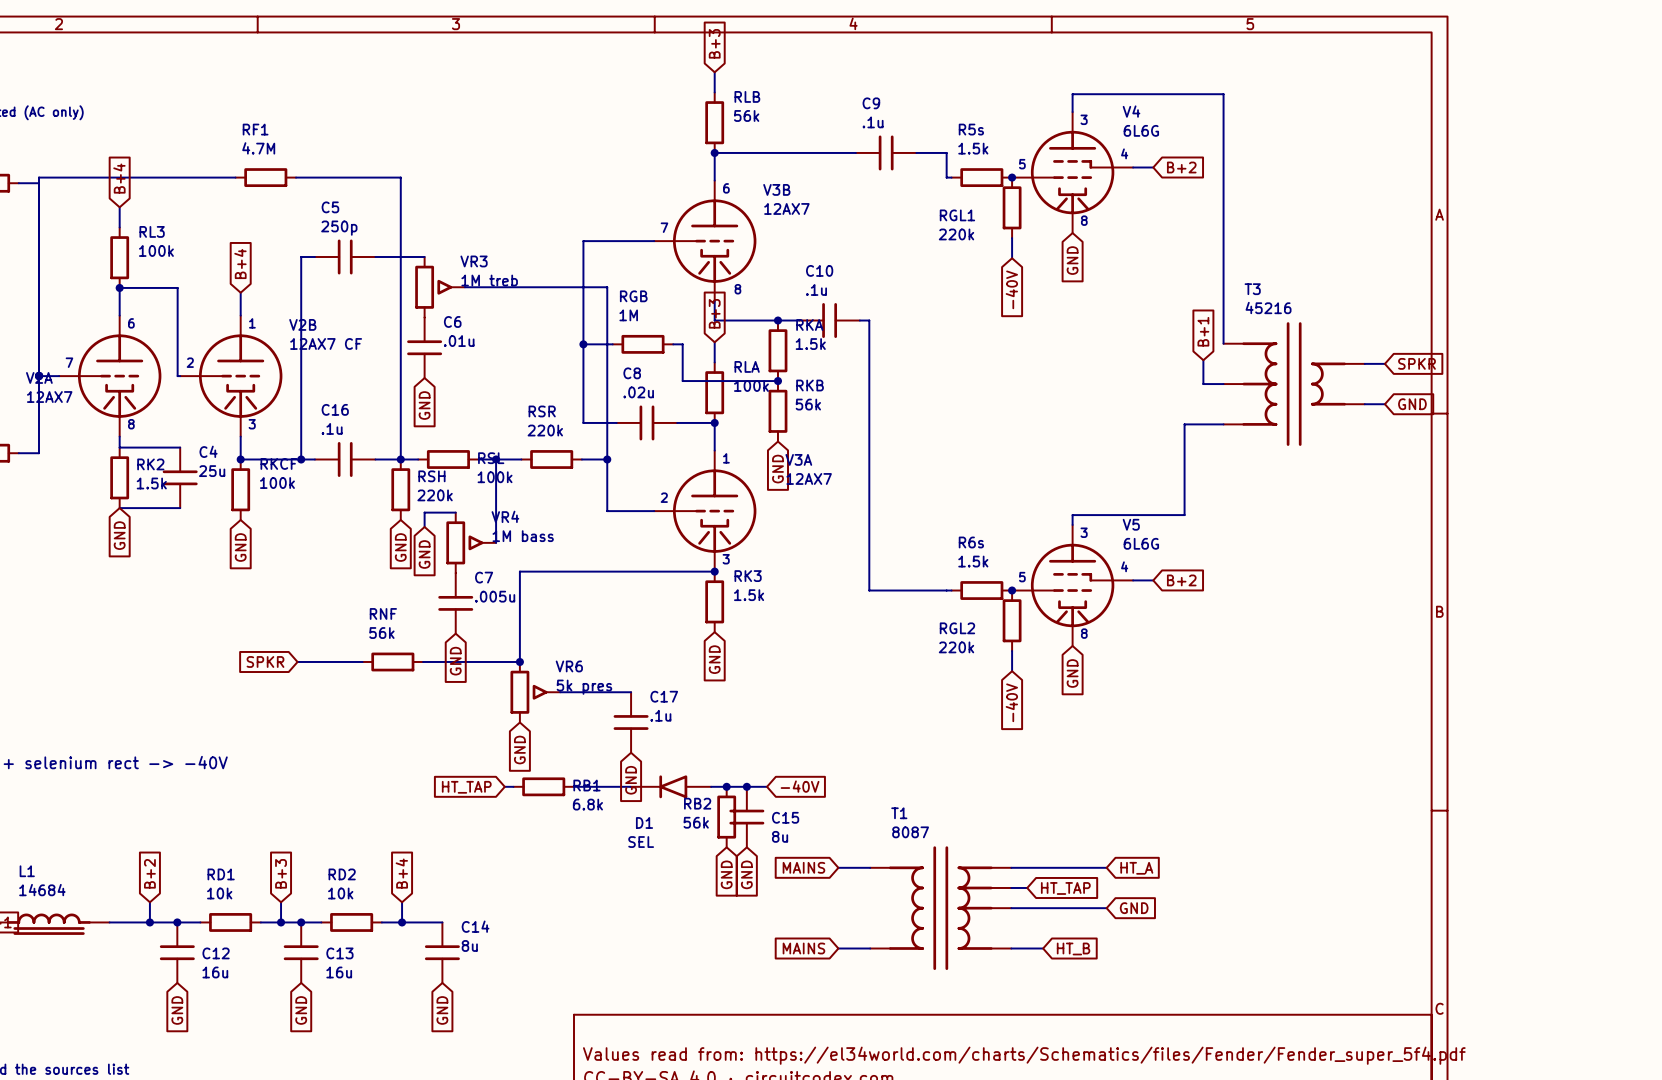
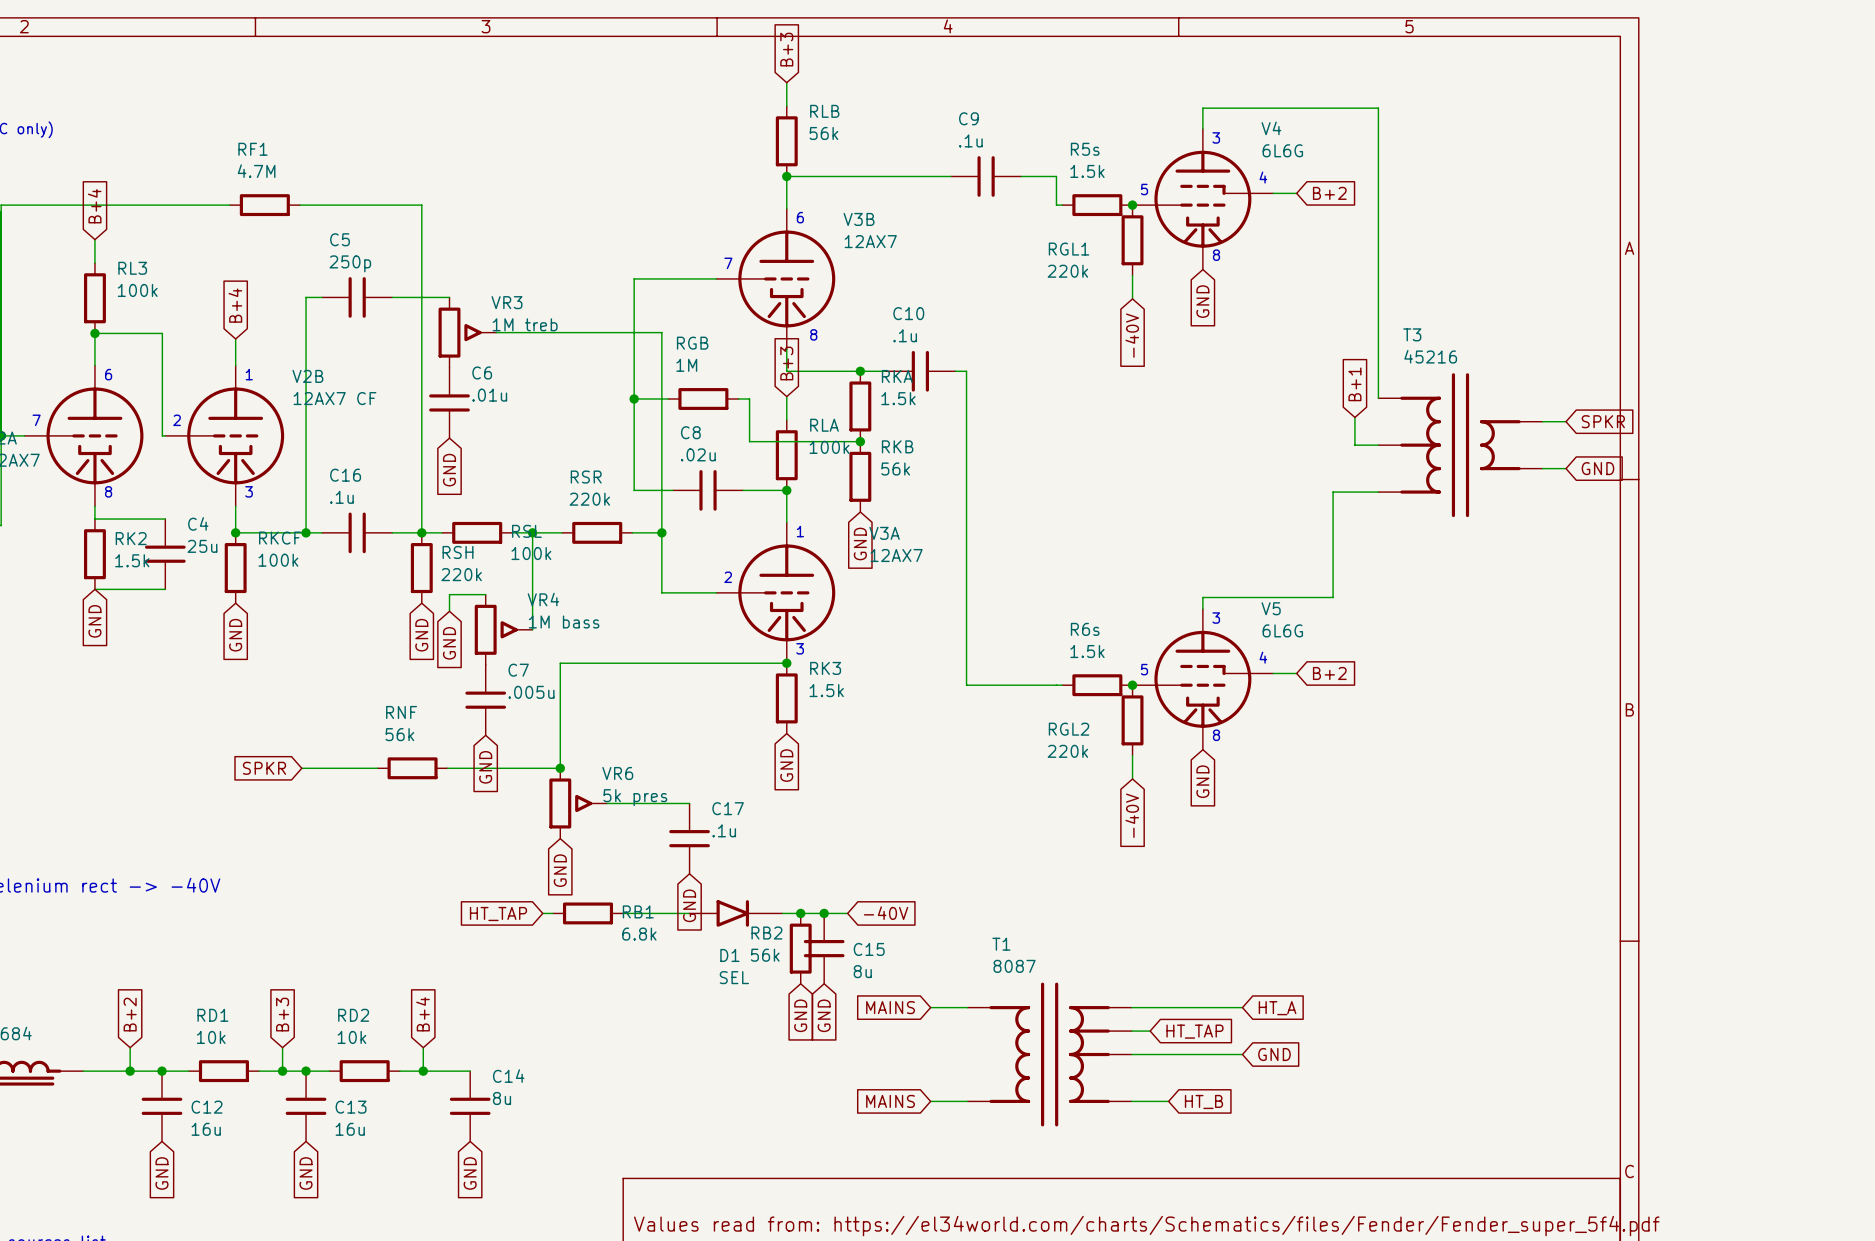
D1 rotation: 0° (673, 786) -> 180° (732, 913)
D1 name position: D1 (644, 822) -> D1 (729, 955)
D1 value position: SEL (641, 842) -> SEL (734, 977)

